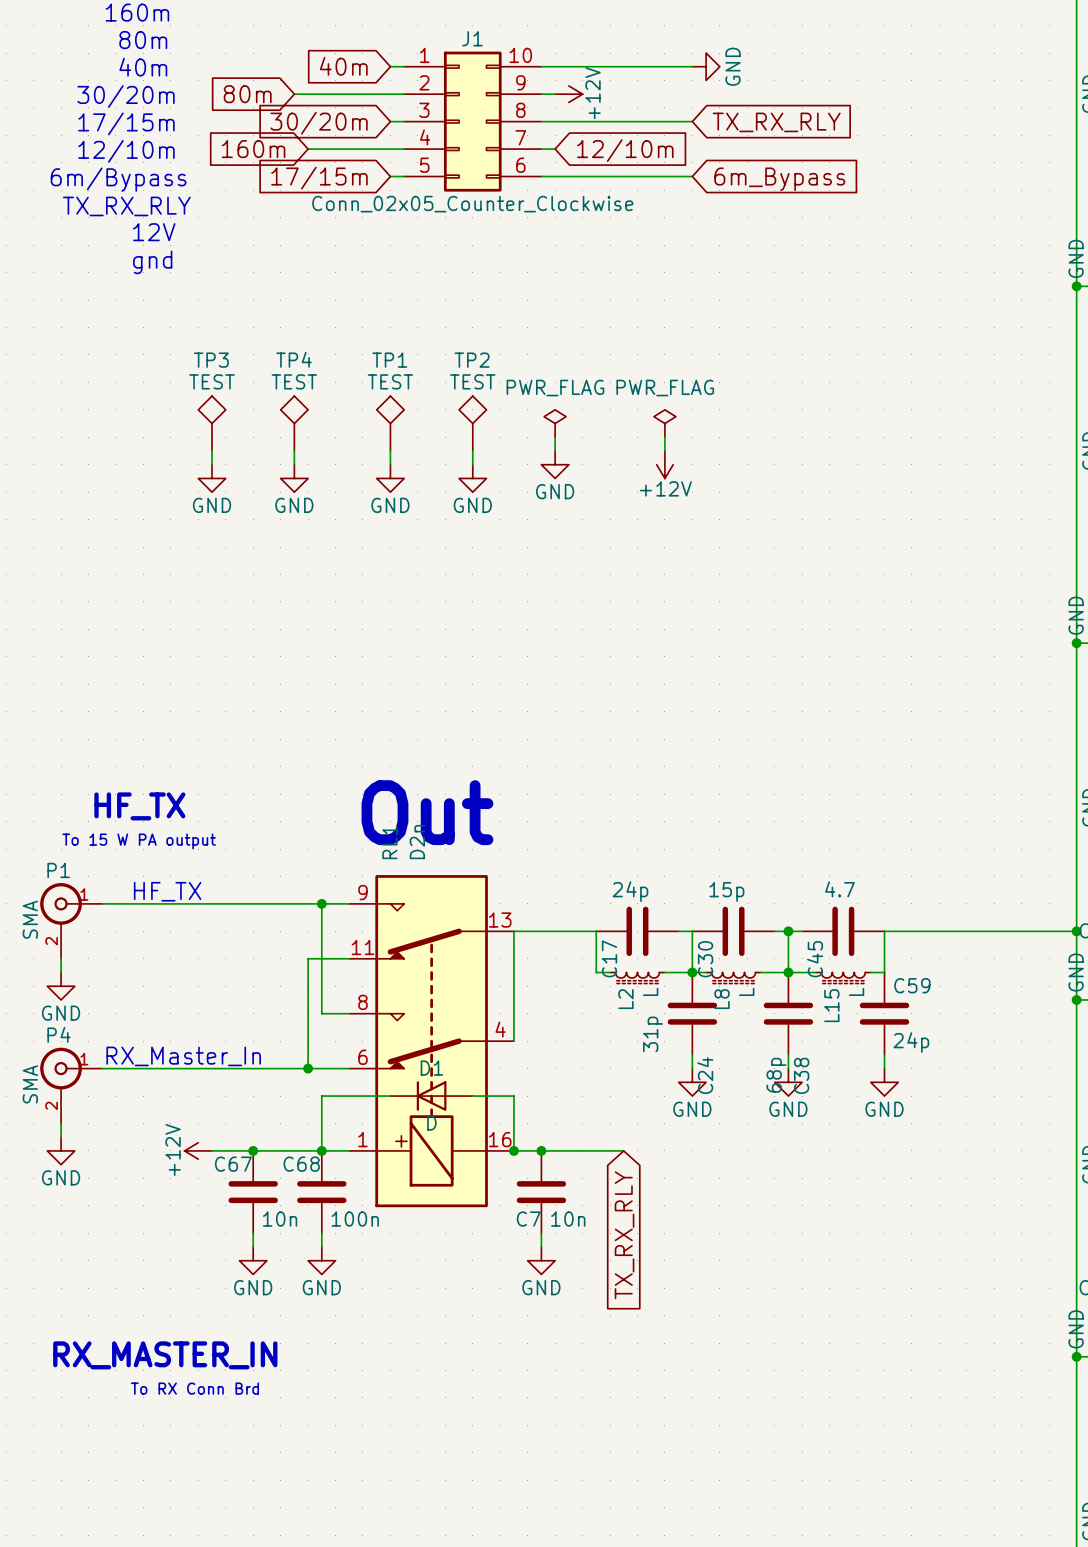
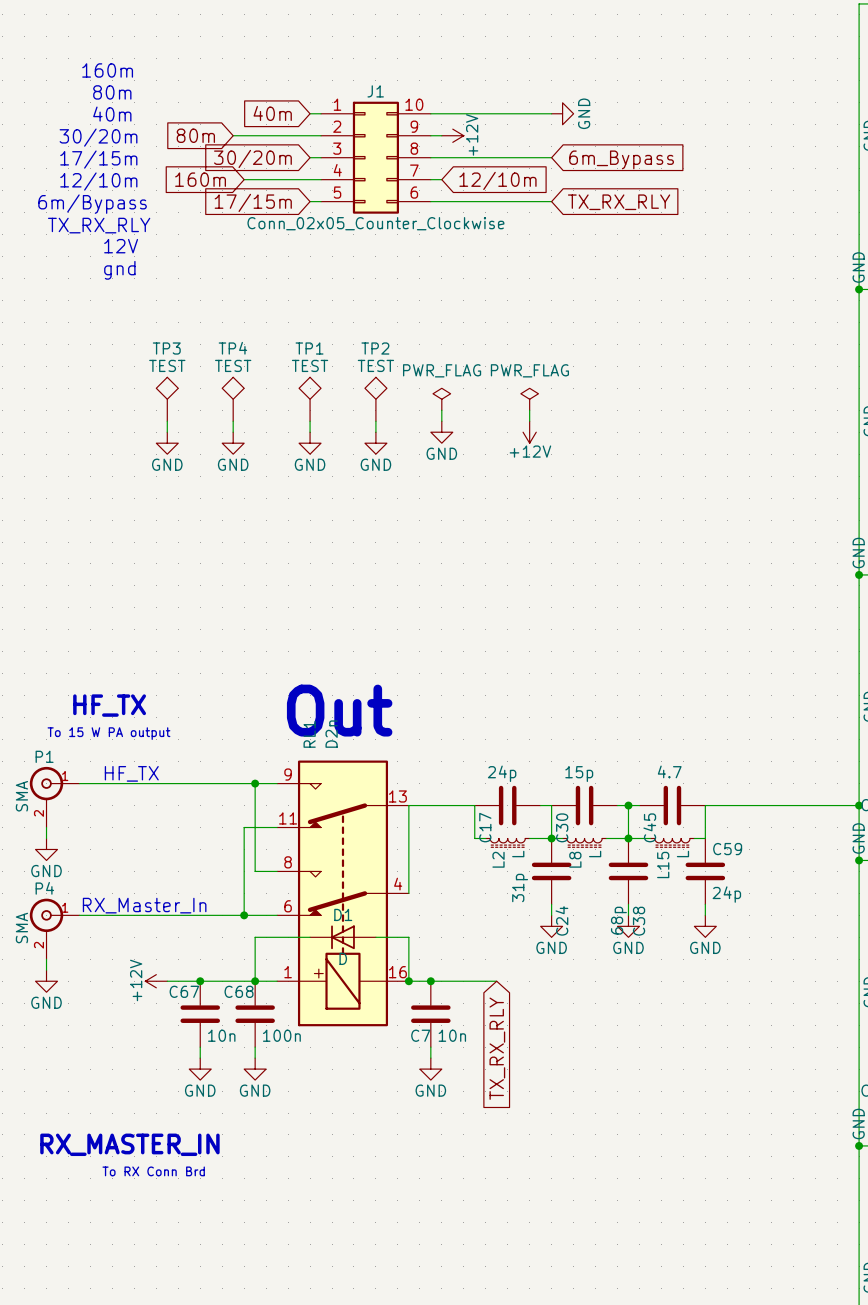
global label: TX_RX_RLY (776, 122) -> 6m_Bypass (621, 159)
global label: 6m_Bypass (779, 179) -> TX_RX_RLY (619, 202)

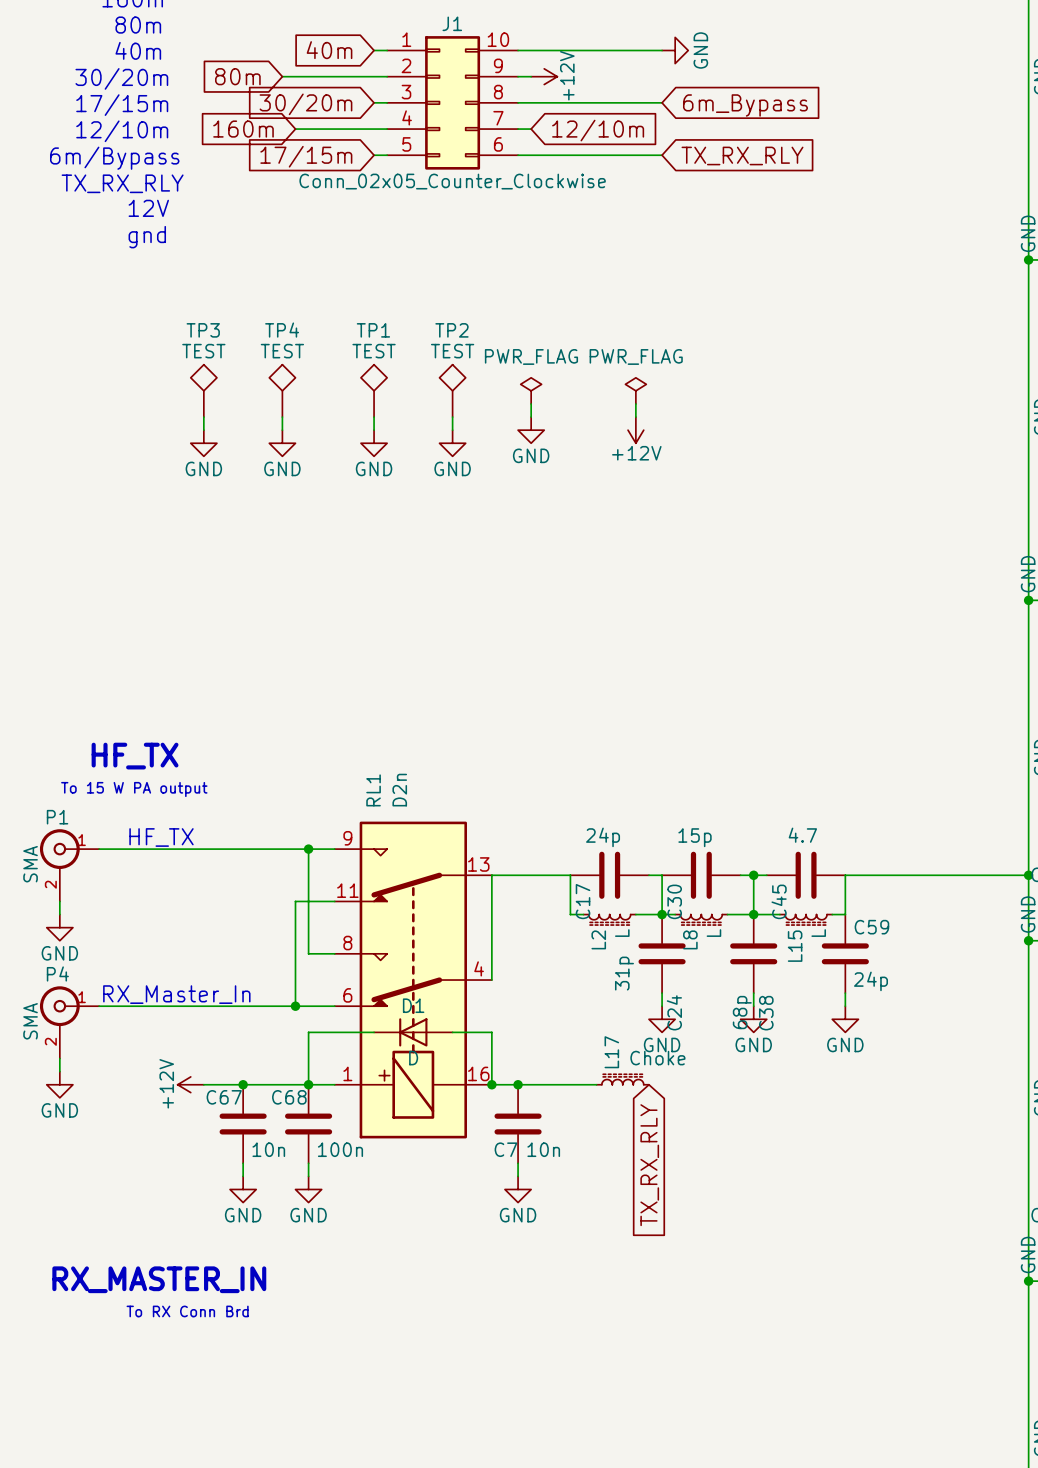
text: Out (339, 710) -> none
L17: none -> Choke (622, 1079)
global label position: TX_RX_RLY (497, 1048) -> TX_RX_RLY (649, 1165)

